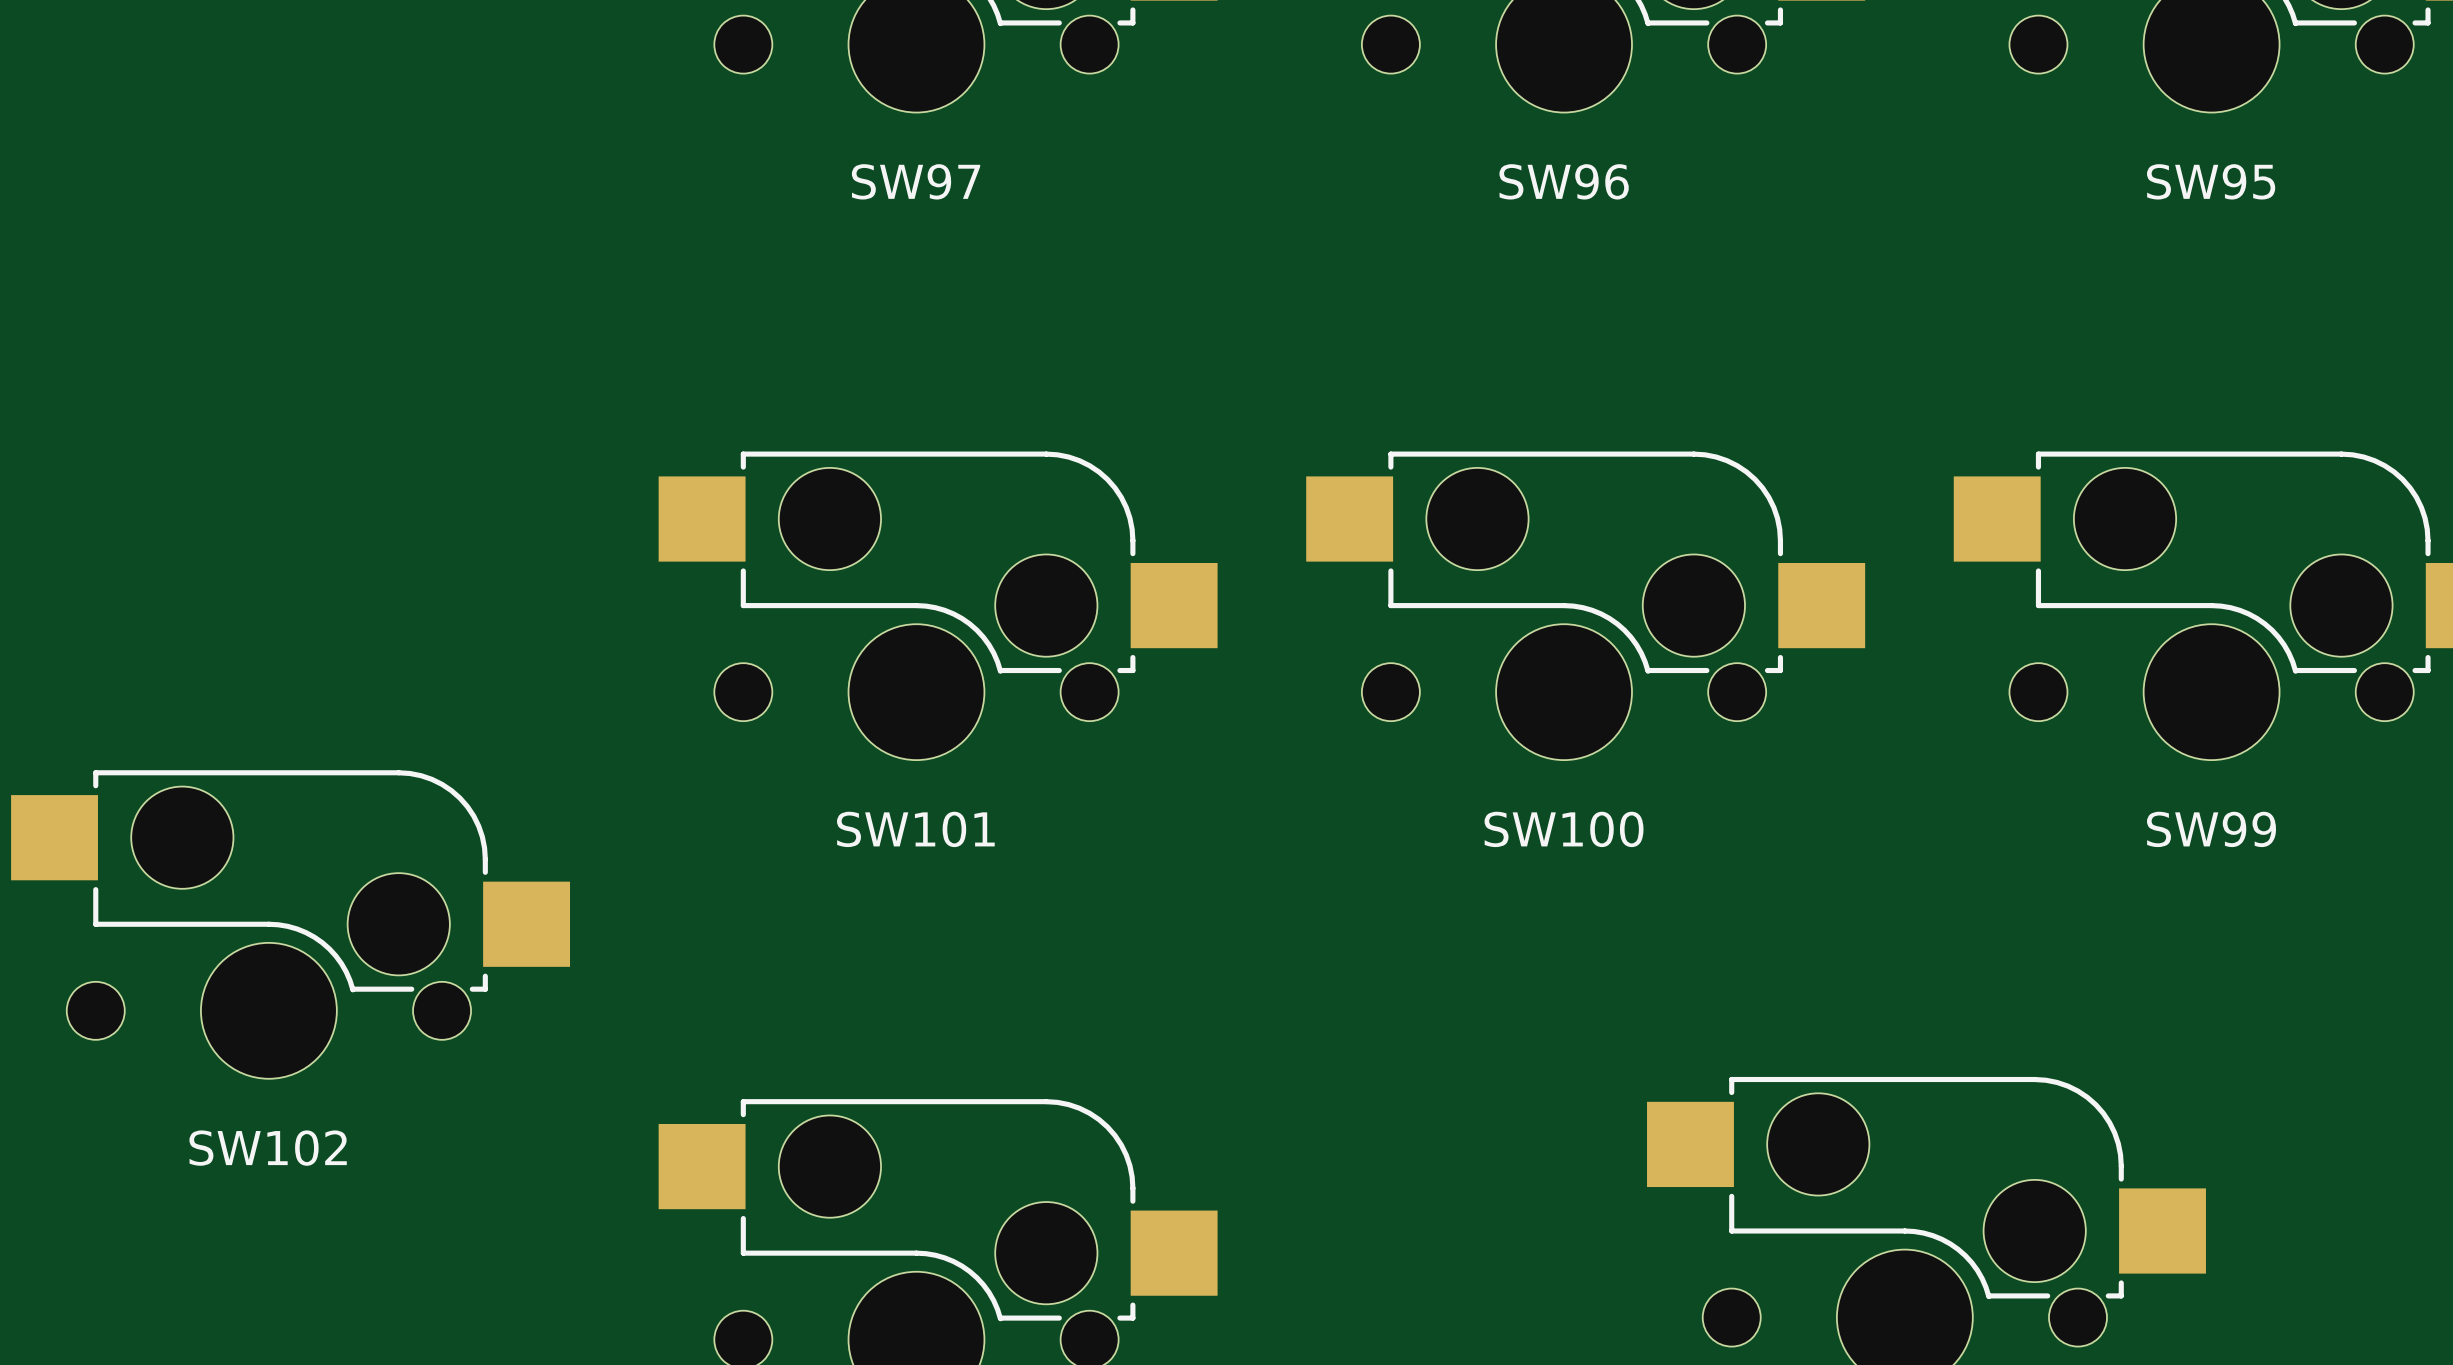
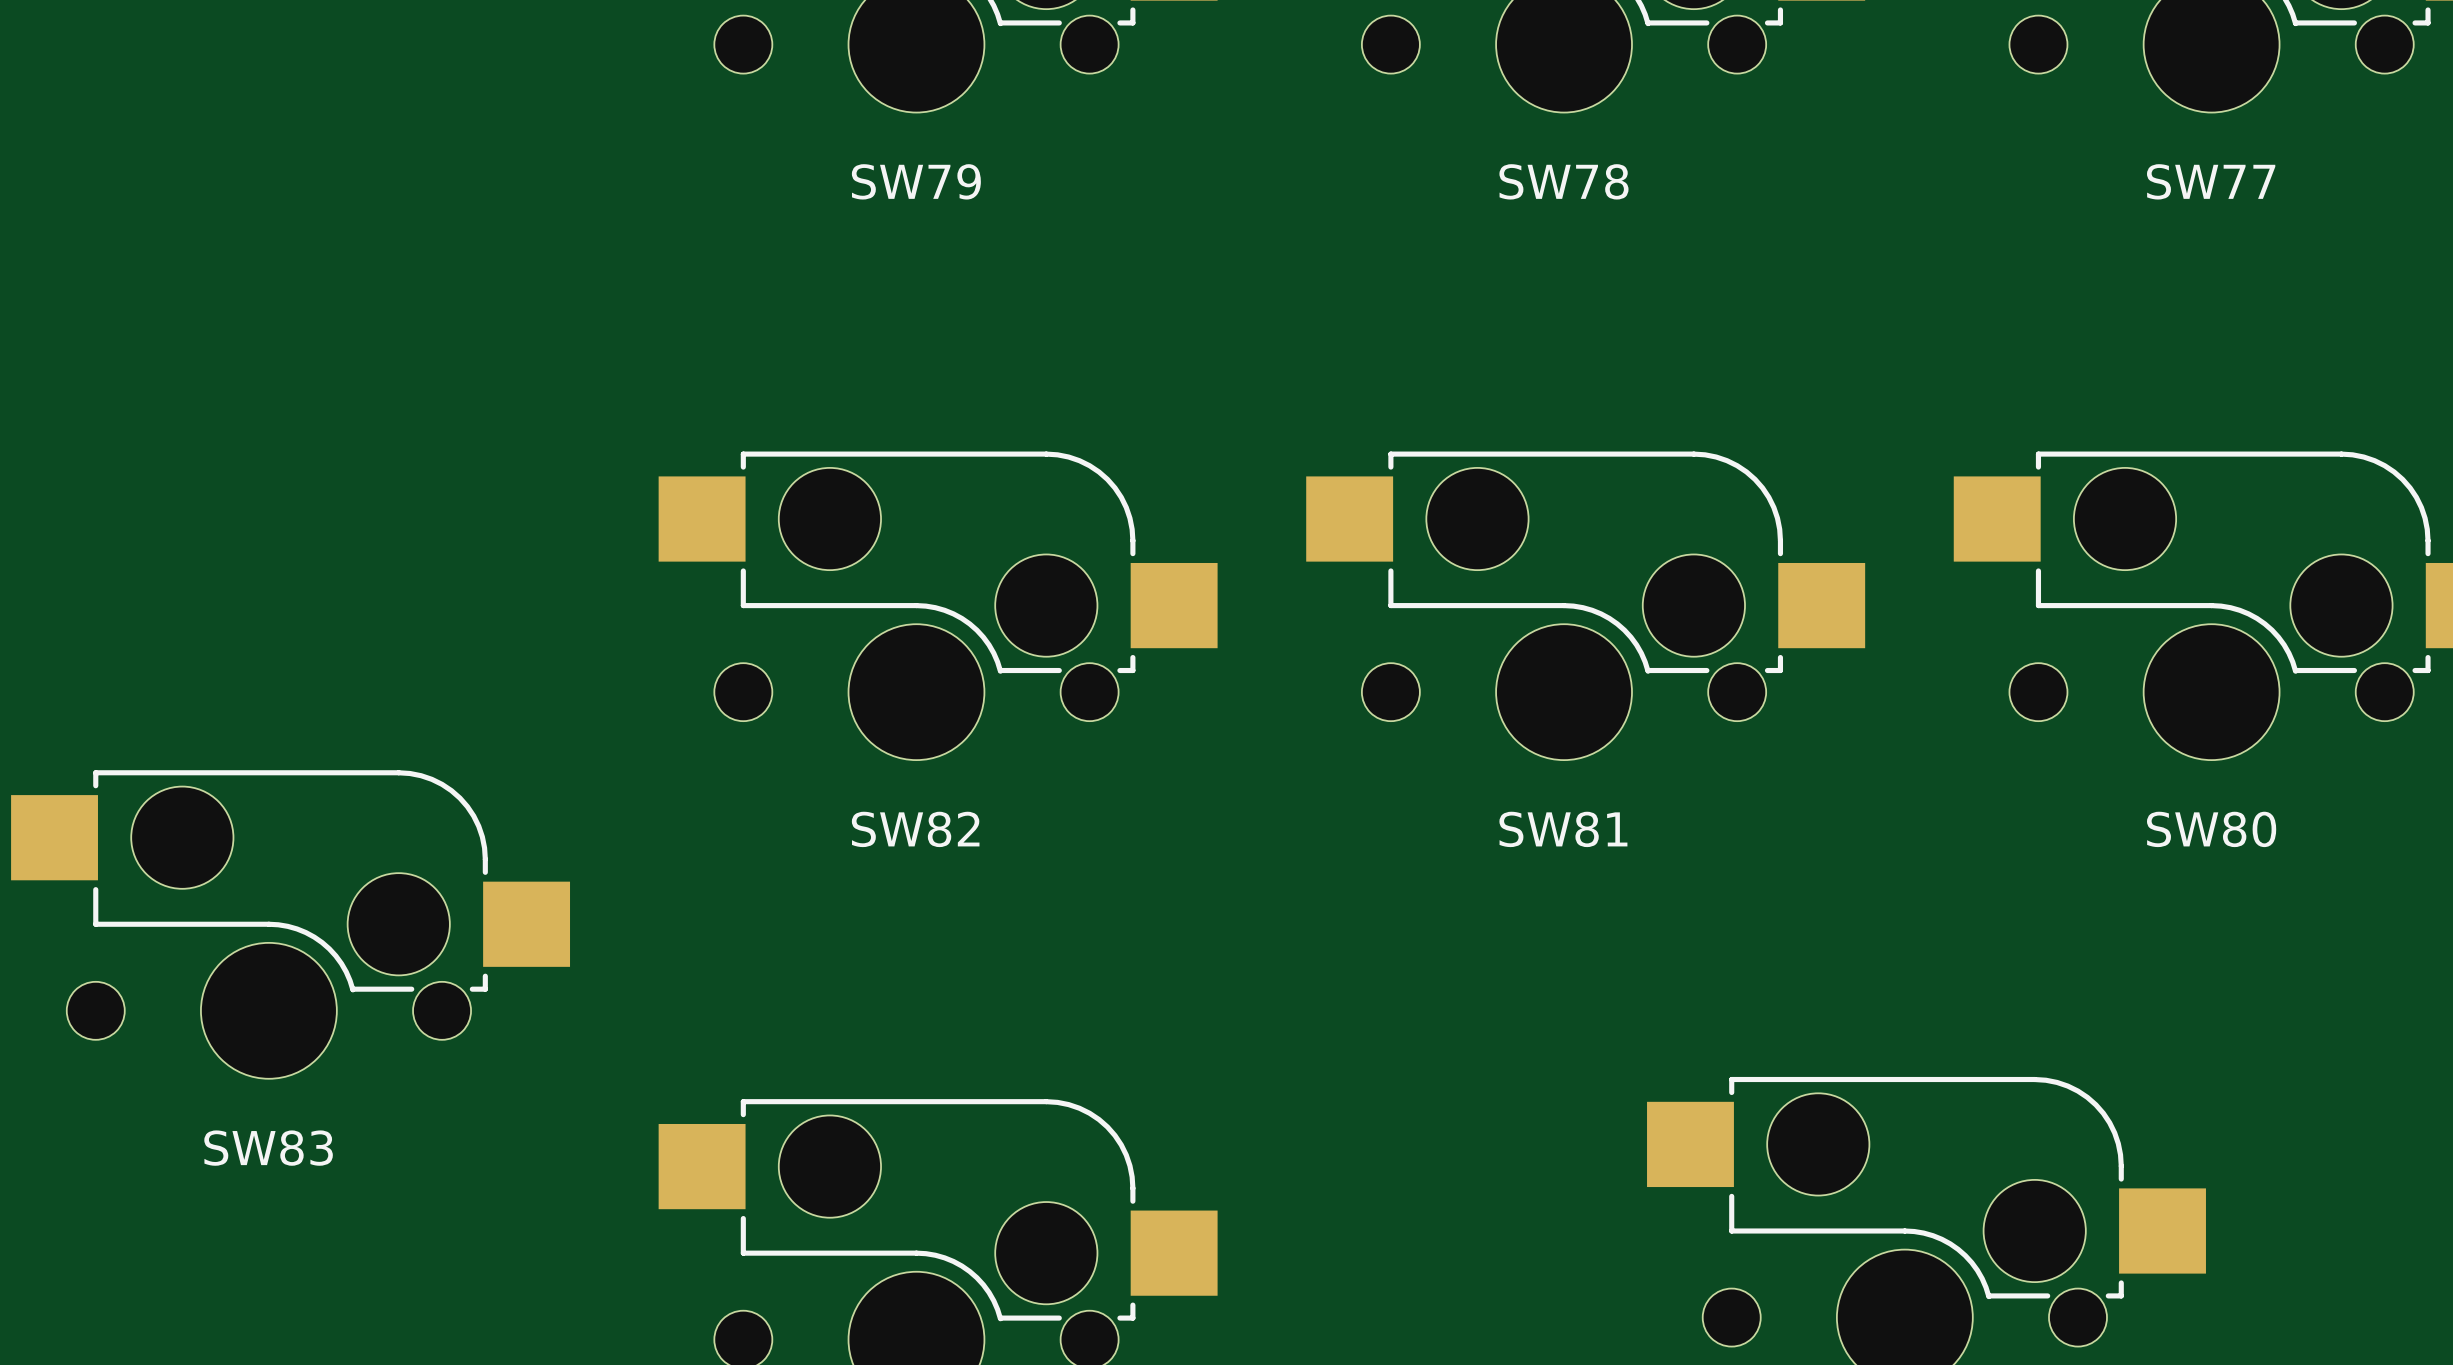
SW97 name: SW97 (916, 181) -> SW79 (916, 181)
SW96 name: SW96 (1564, 181) -> SW78 (1563, 181)
SW95 name: SW95 (2211, 181) -> SW77 (2211, 181)
SW101 name: SW101 (915, 829) -> SW82 (915, 829)
SW100 name: SW100 (1564, 829) -> SW81 (1563, 829)
SW99 name: SW99 (2211, 829) -> SW80 (2211, 829)
SW102 name: SW102 (268, 1148) -> SW83 (268, 1148)

